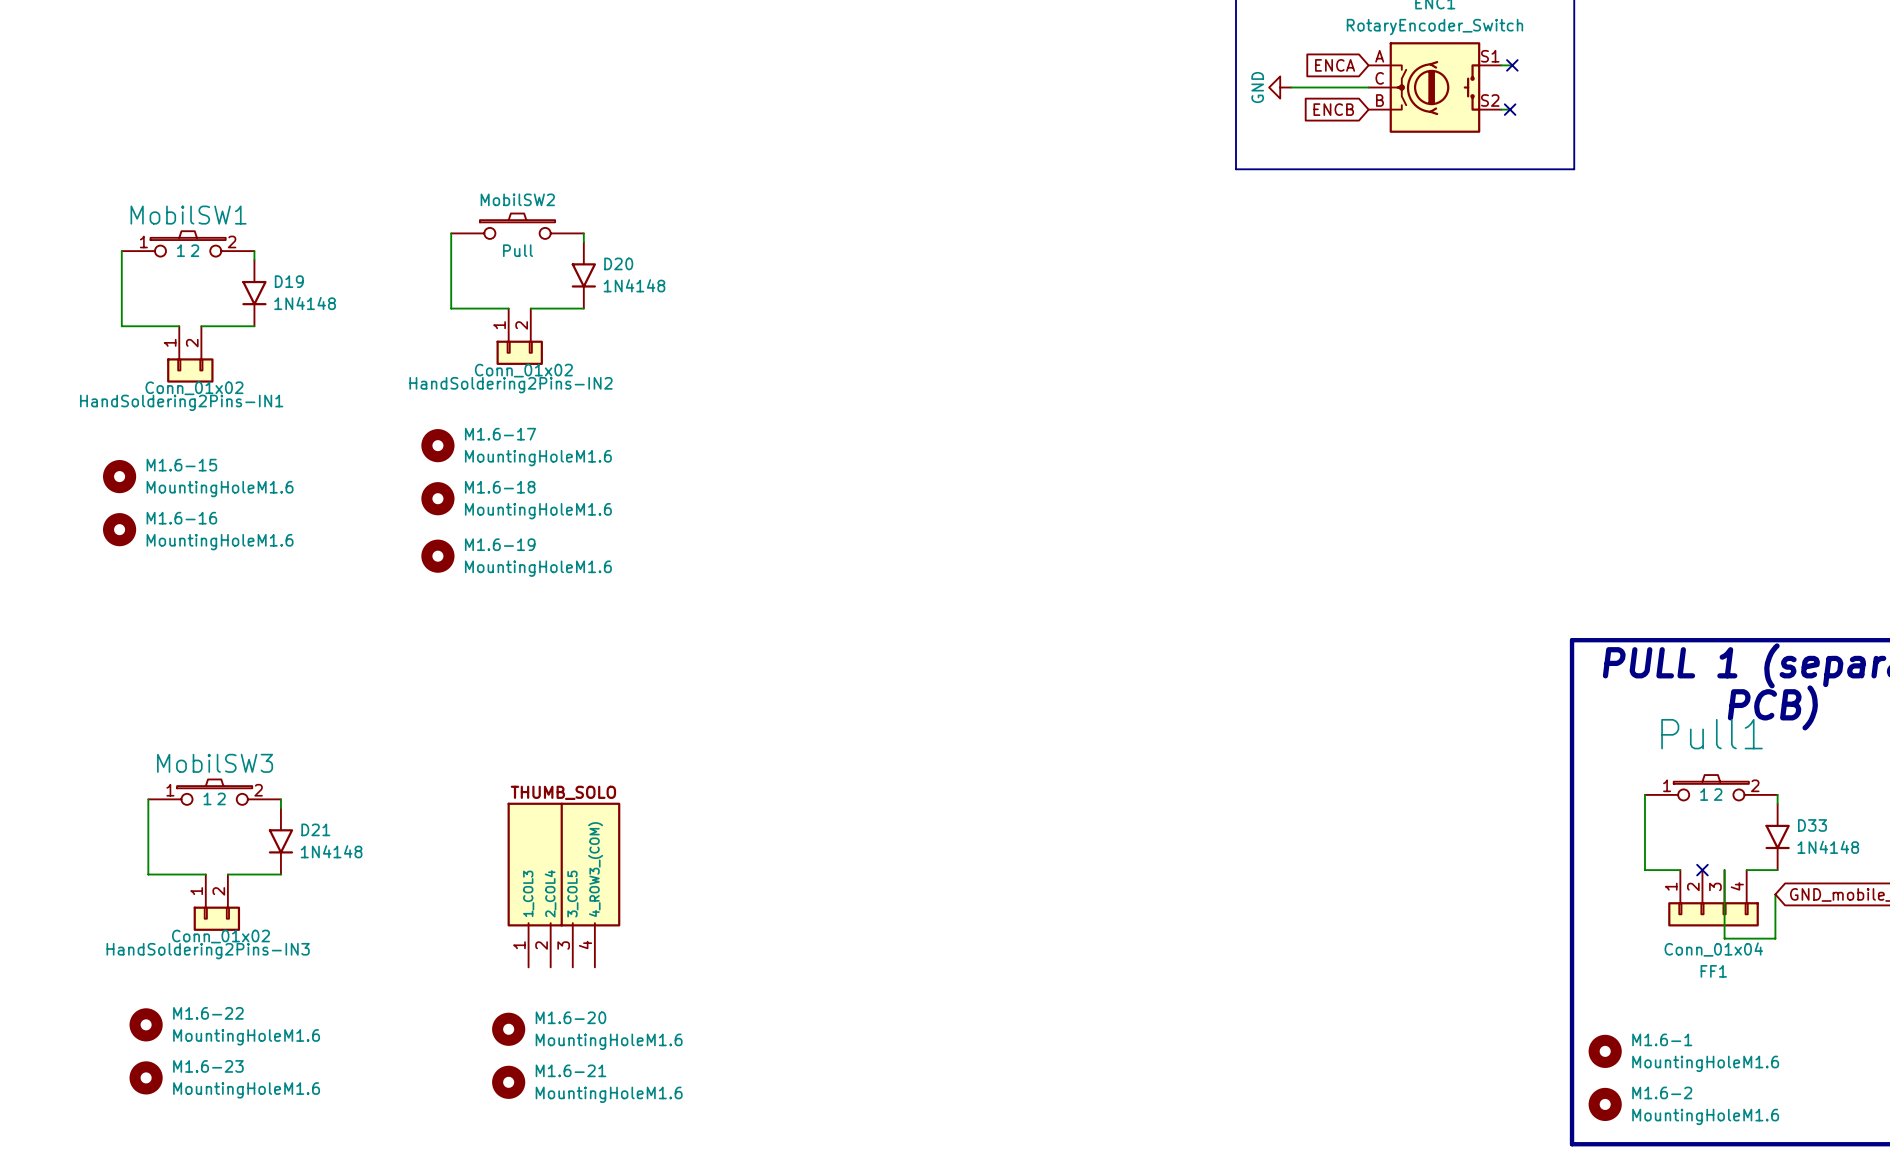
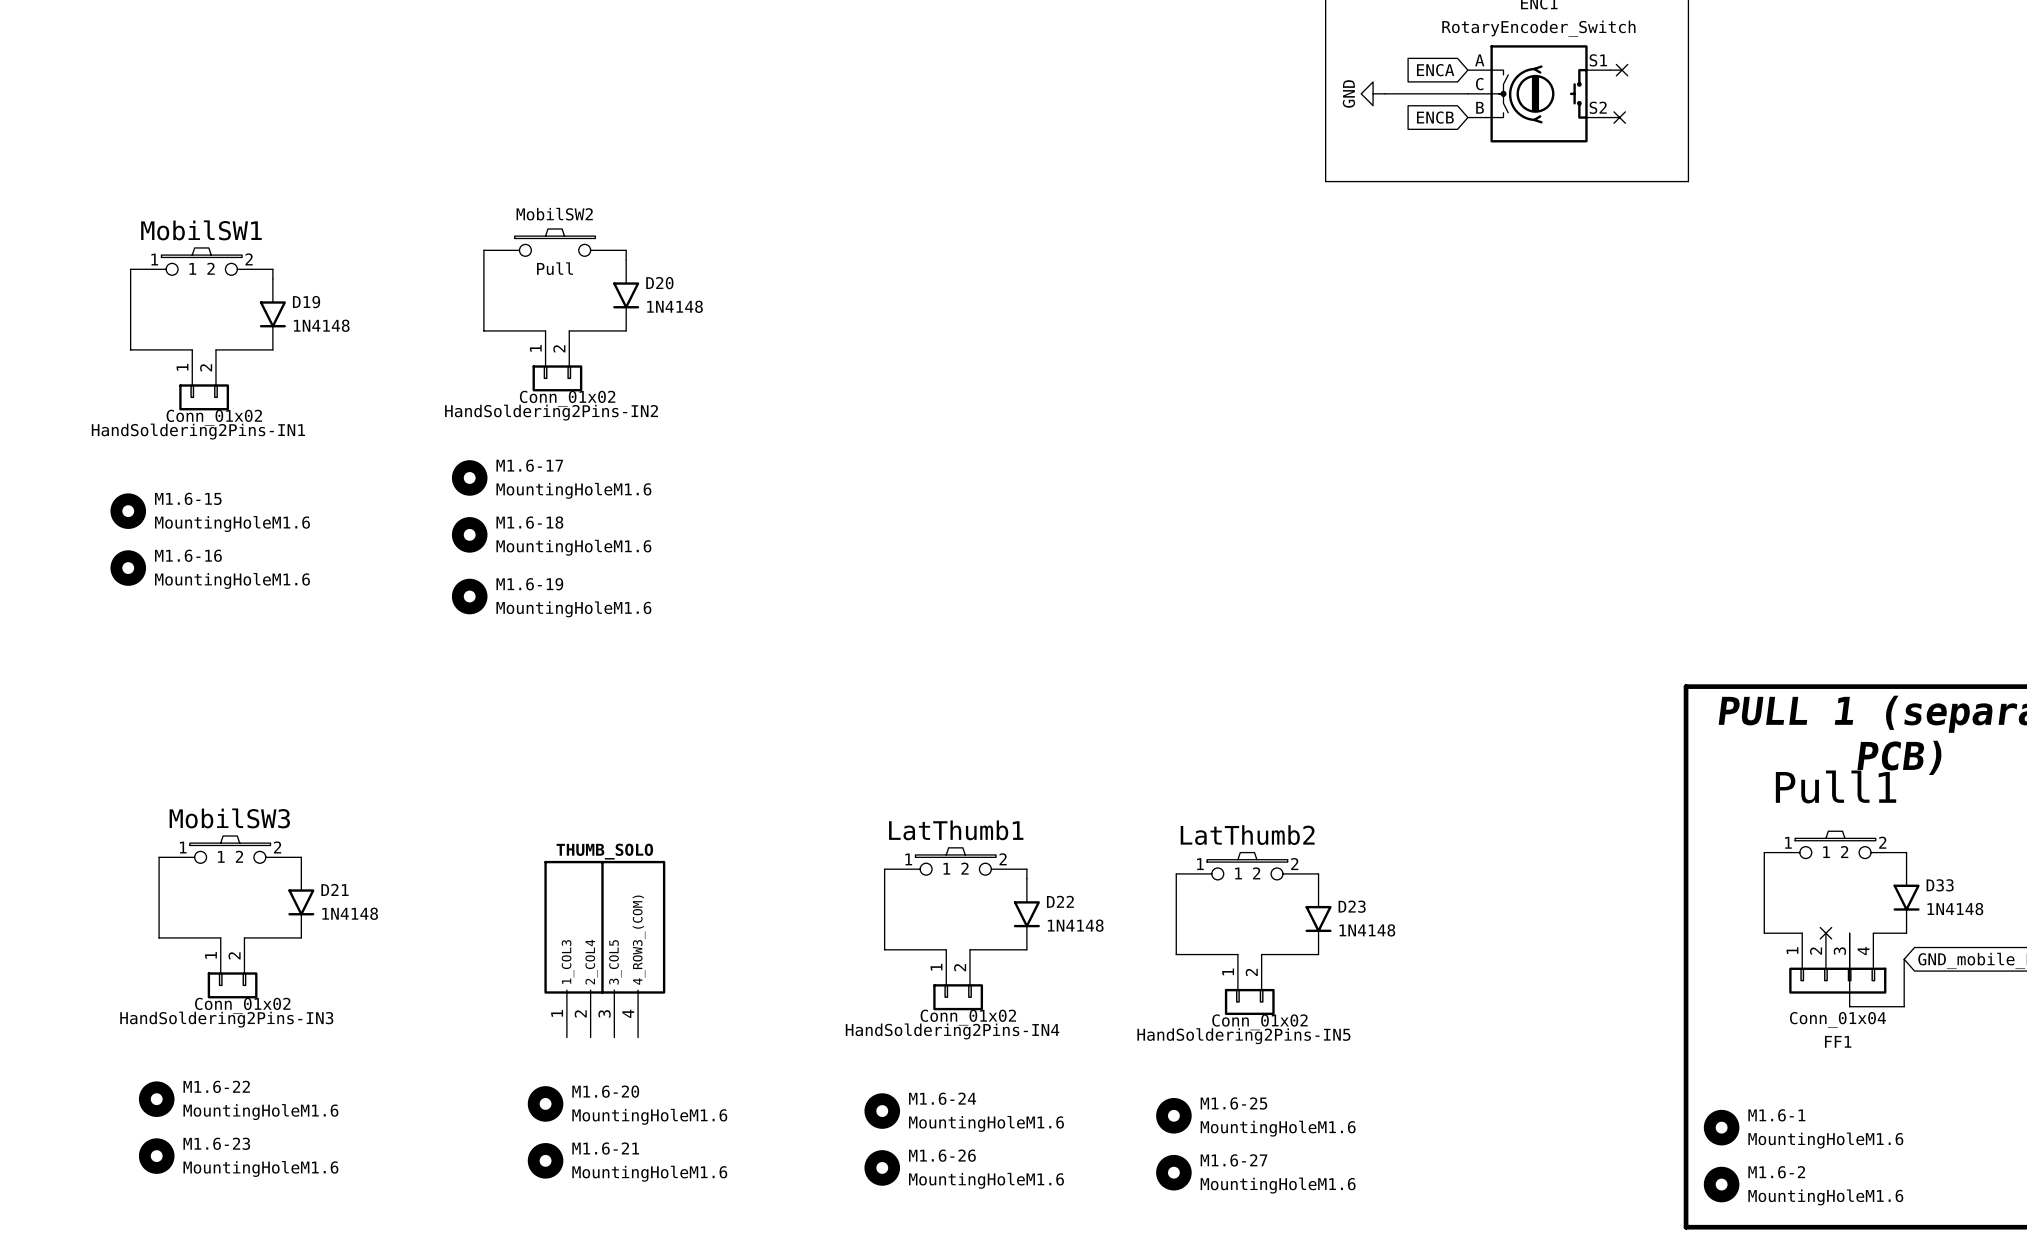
LatThumb1: none -> (955, 861)
LatThumb2: none -> (1247, 866)
wire: none -> (884, 869) (884, 949) (946, 949)
wire: none -> (1026, 869) (1026, 878)
wire: none -> (1176, 873) (1176, 954) (1237, 954)
wire: none -> (1318, 873) (1318, 883)
D22: none -> 1N4148 (1026, 914)
D23: none -> 1N4148 (1318, 918)
wire: none -> (969, 949) (1026, 949)
wire: none -> (1261, 954) (1318, 954)
HandSoldering2Pins-IN4: none -> Conn_01x02 (958, 980)
HandSoldering2Pins-IN5: none -> Conn_01x02 (1249, 984)
M1.6-24: none -> MountingHoleM1.6 (882, 1111)
M1.6-25: none -> MountingHoleM1.6 (1173, 1115)
M1.6-26: none -> MountingHoleM1.6 (882, 1167)
M1.6-27: none -> MountingHoleM1.6 (1173, 1172)

